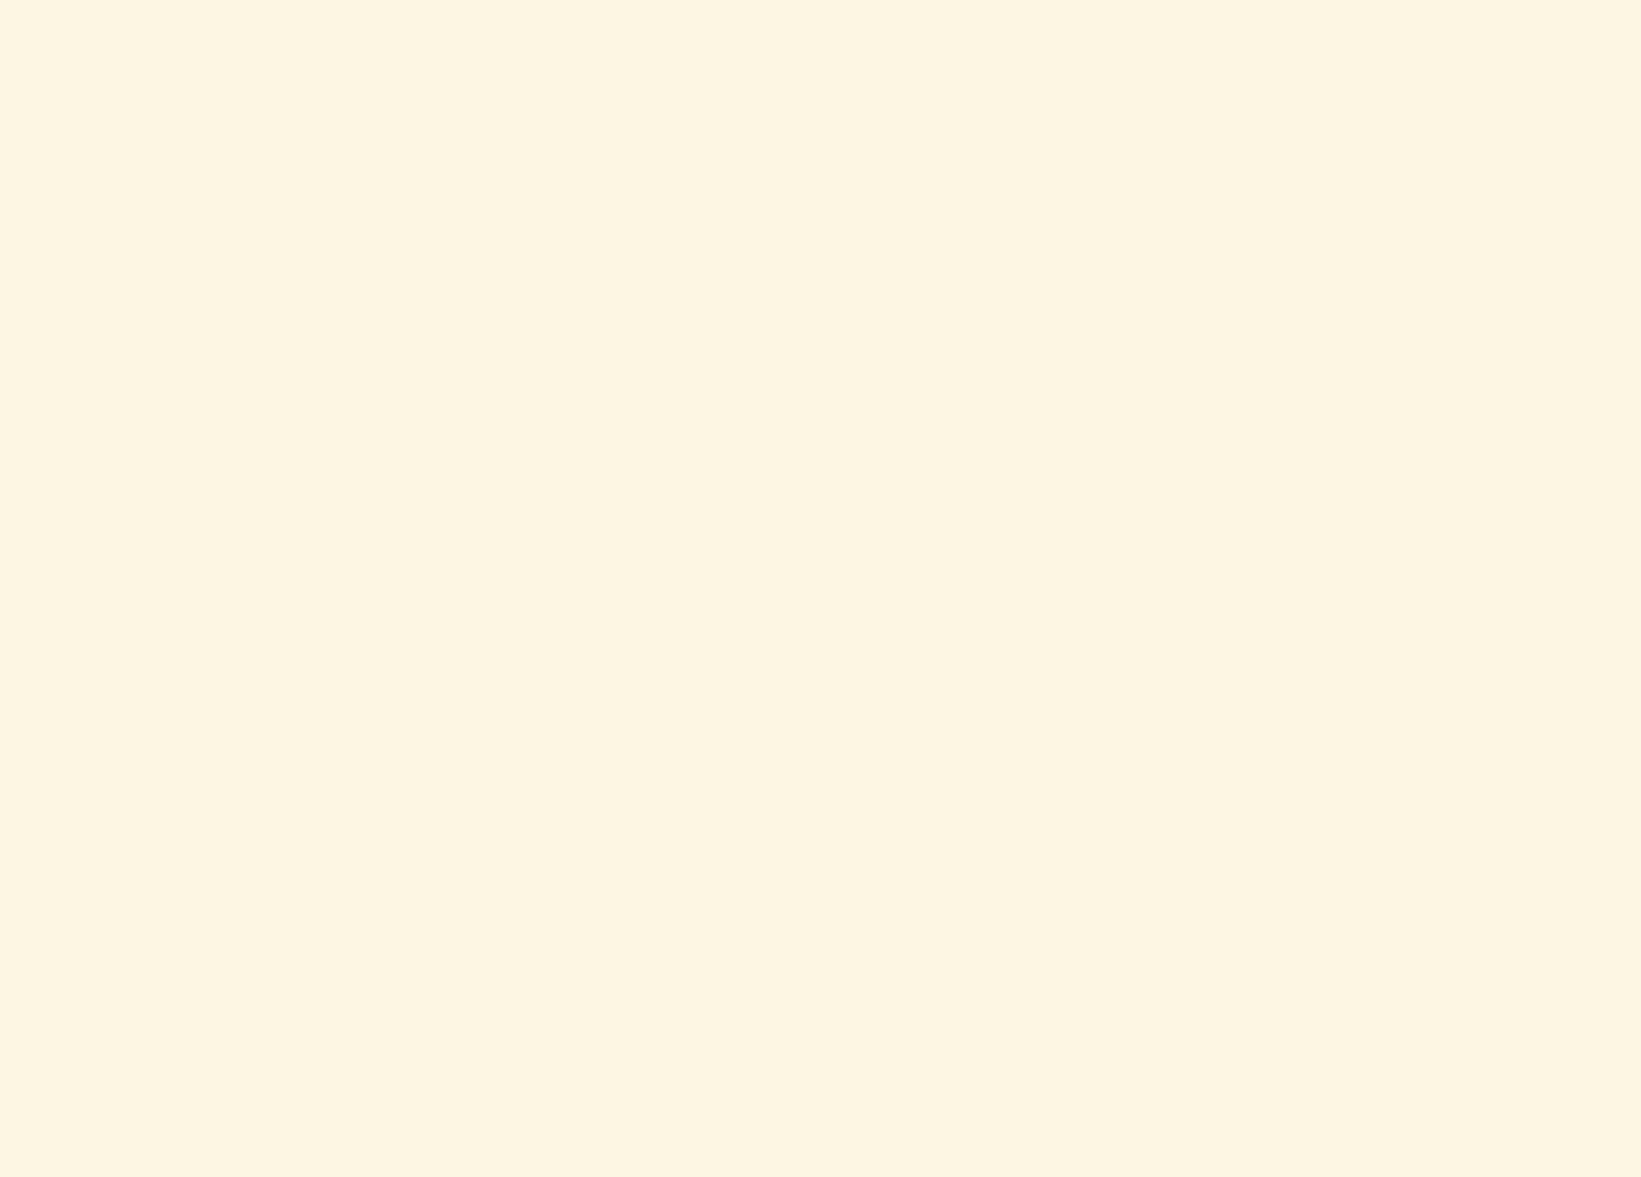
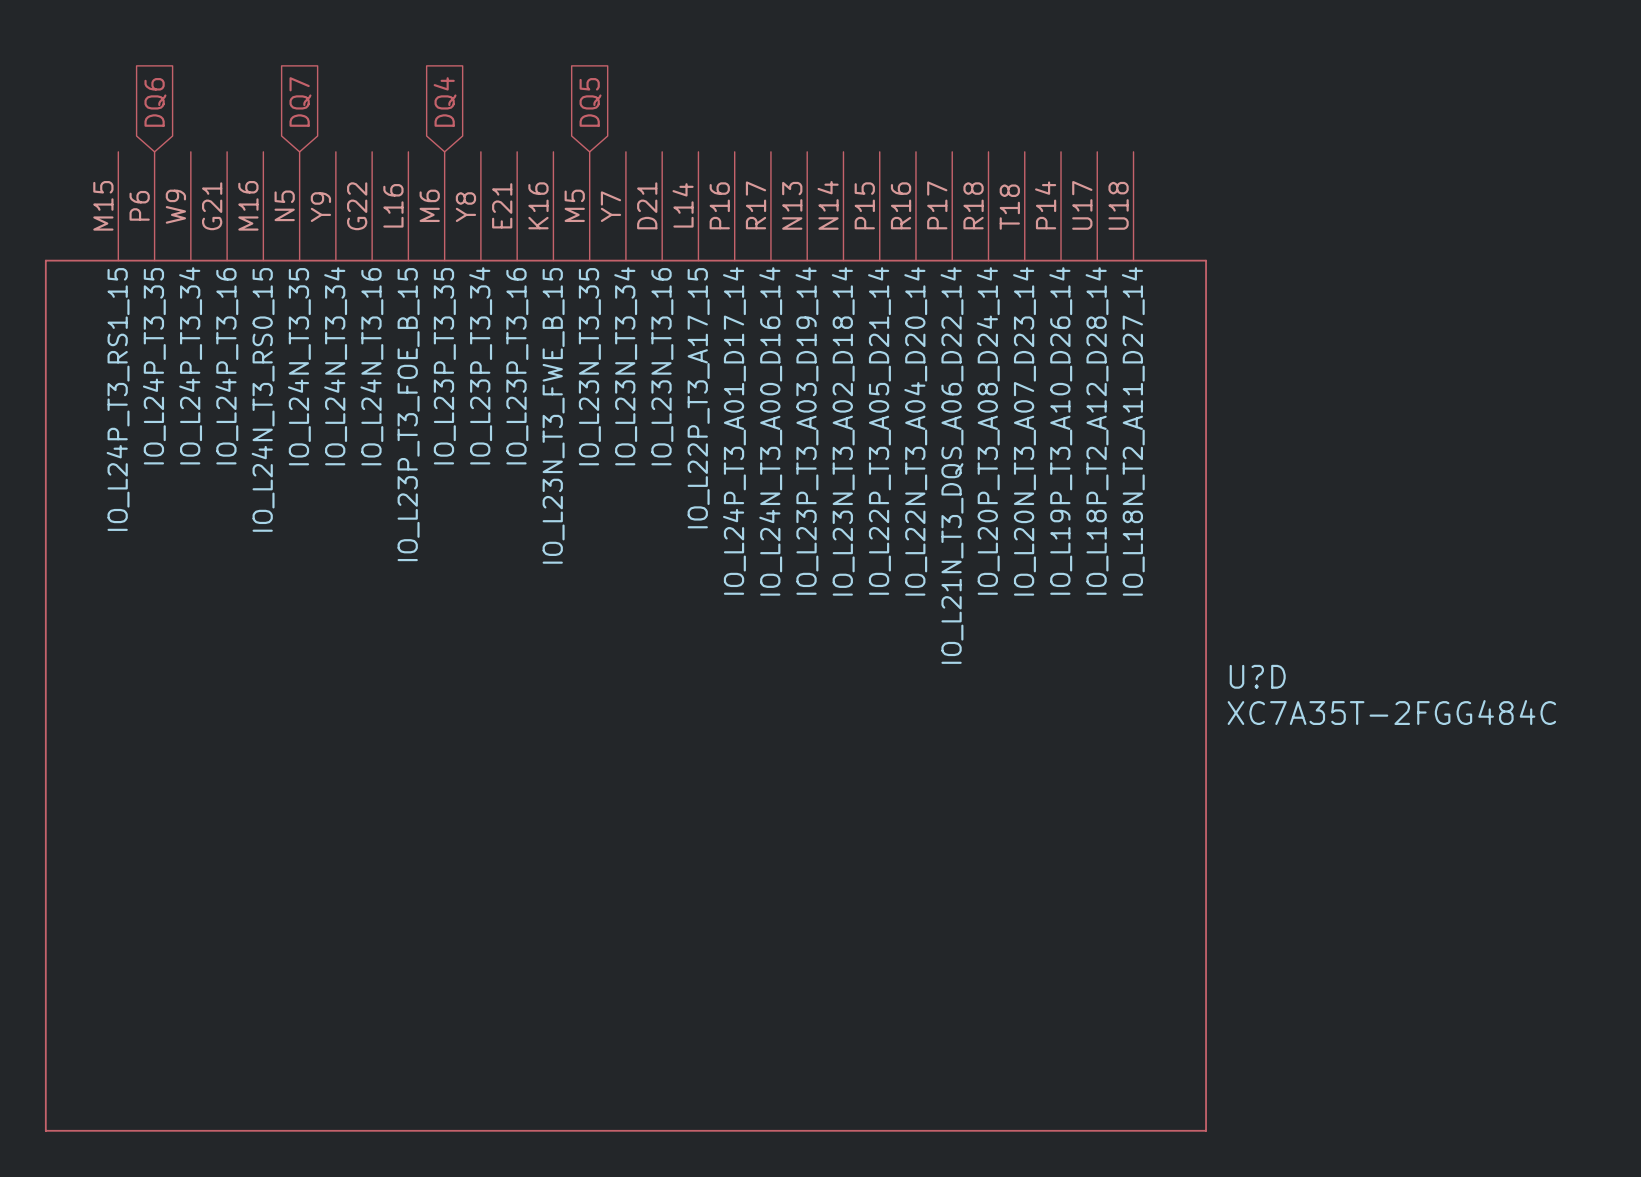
global label: none -> DQ6 (155, 102)
global label: none -> DQ4 (445, 101)
global label: none -> DQ7 (300, 101)
global label: none -> DQ5 (590, 102)
U?D: none -> XC7A35T-2FGG484C (625, 641)

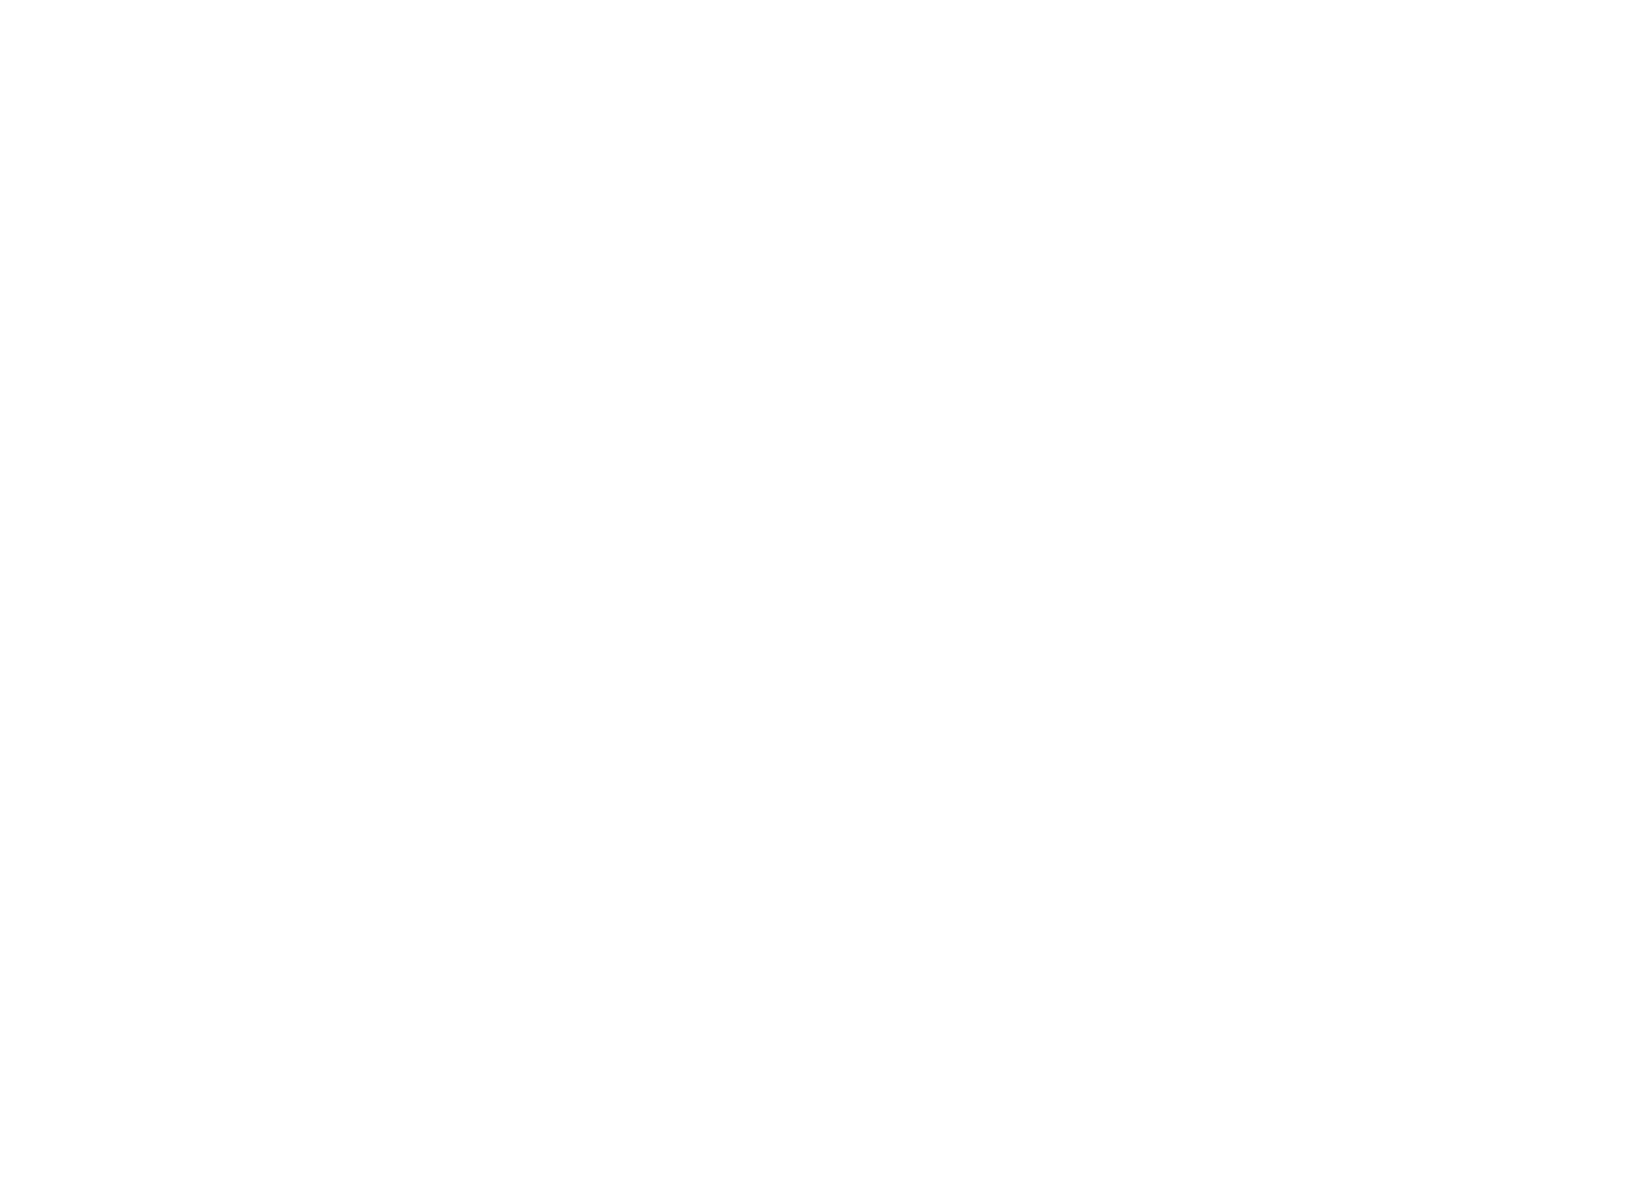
global label: DQ7 (300, 101) -> none
global label: DQ4 (445, 101) -> none
global label: DQ6 (155, 102) -> none
global label: DQ5 (590, 102) -> none
U?D: XC7A35T-2FGG484C (625, 641) -> none

